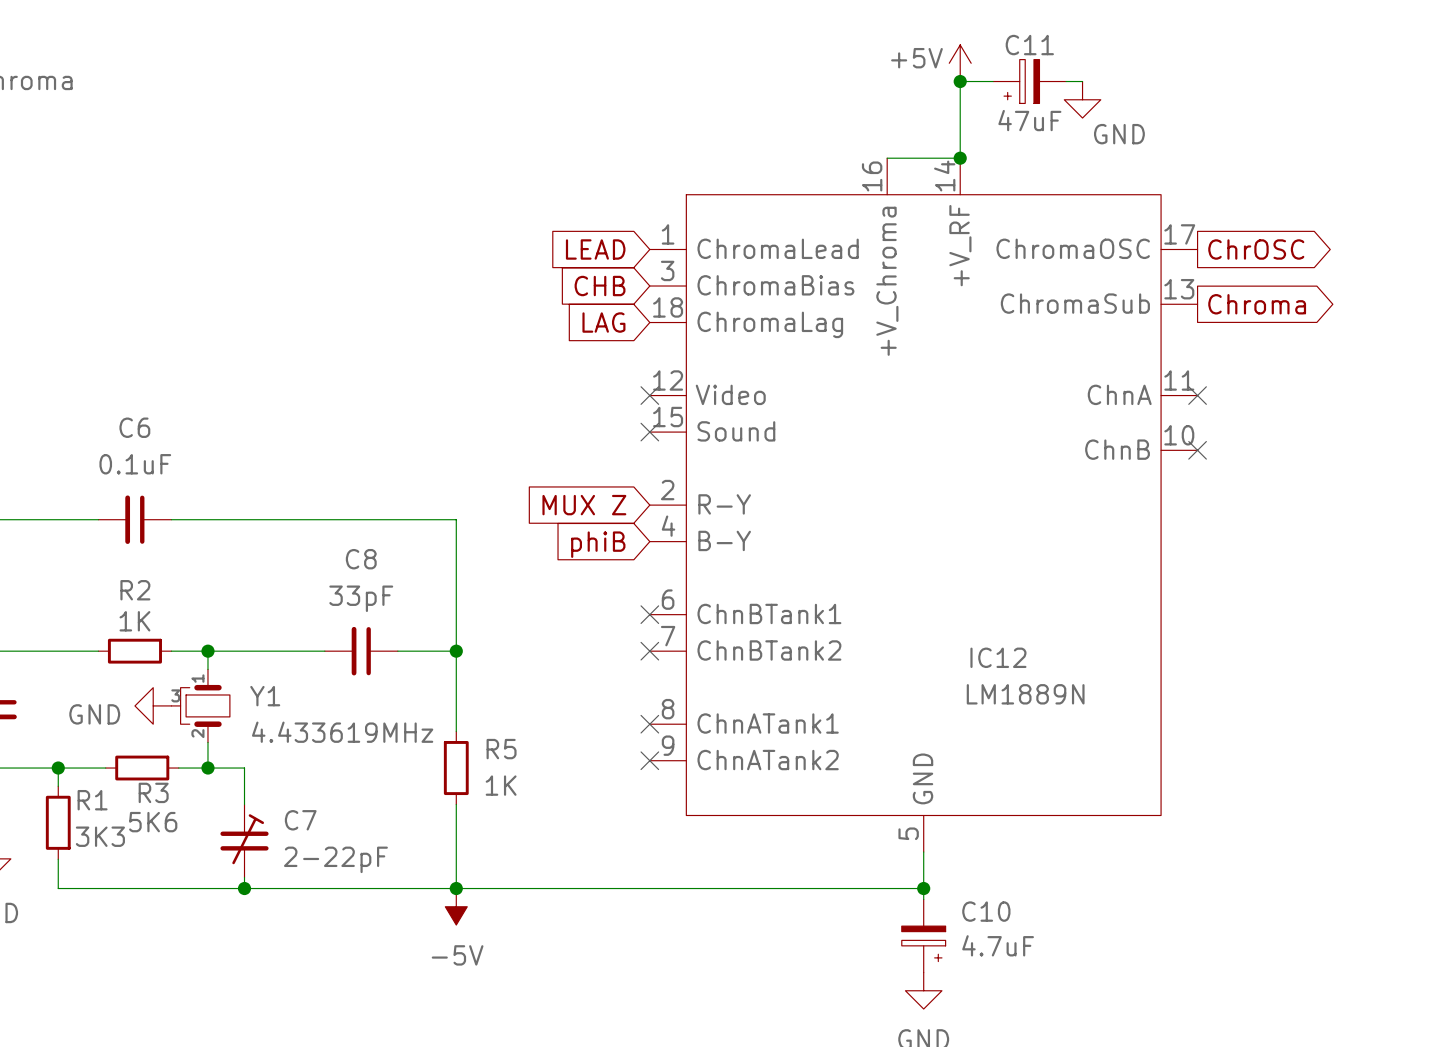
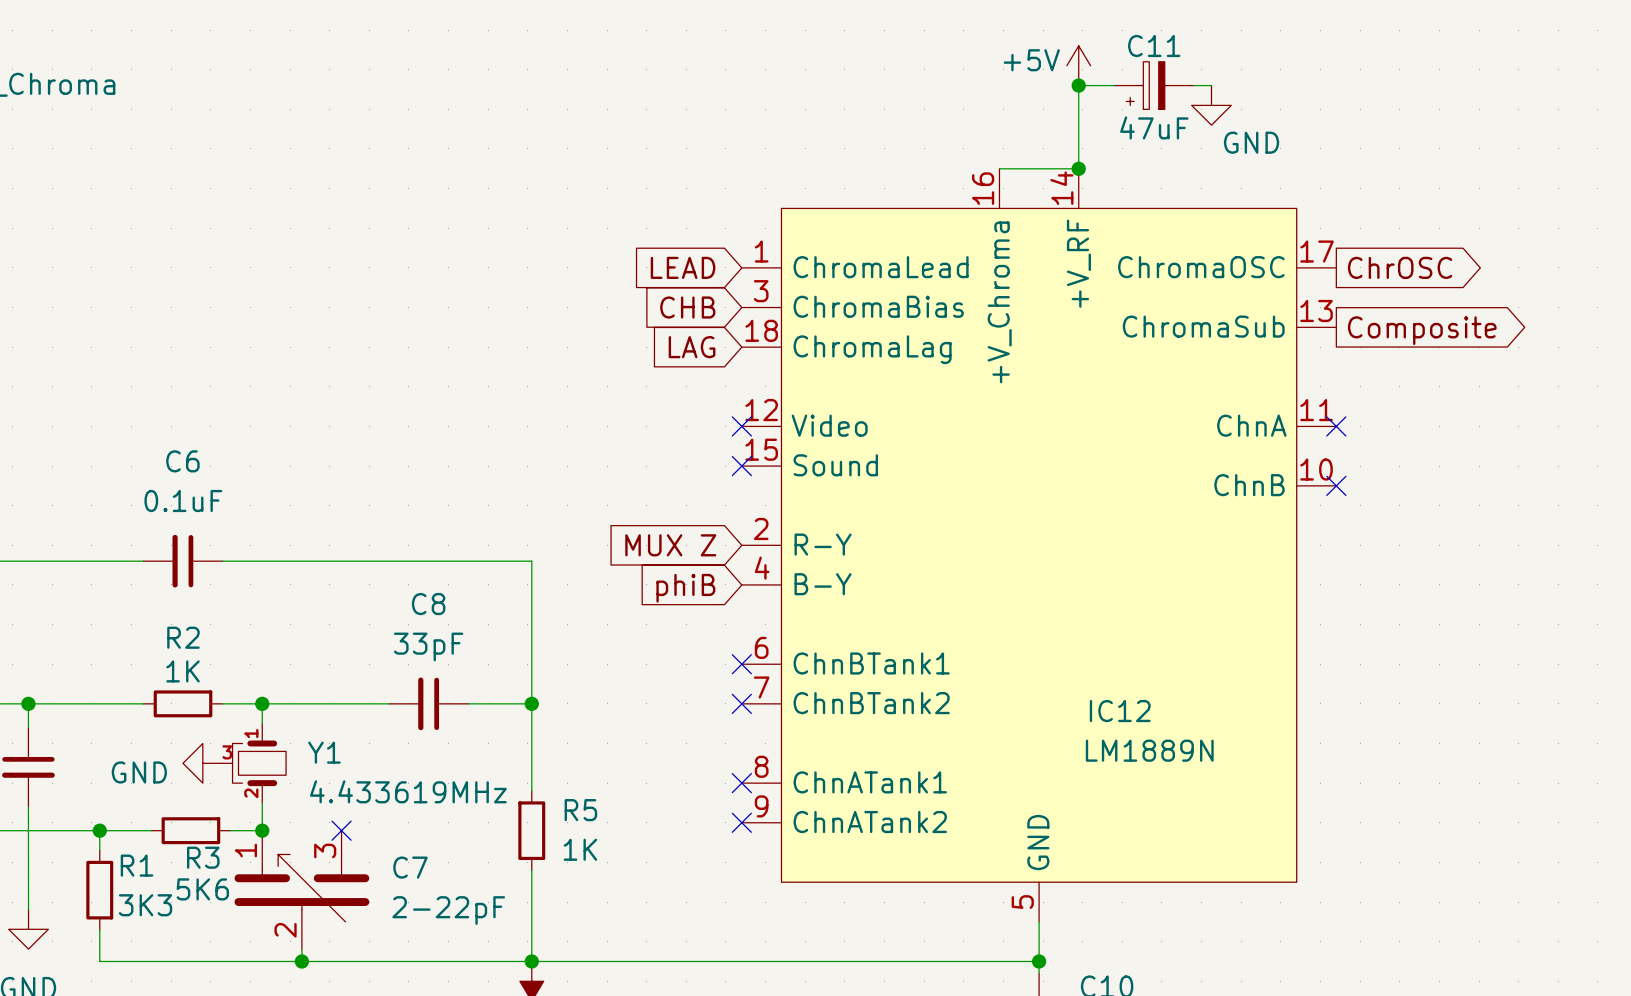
global label: Chroma (1257, 304) -> Composite (1422, 330)
wire: (207, 768) (244, 768) (244, 804) -> none
no-connect mark: none -> (341, 830)
C7 symbol: [220, 804, 269, 878] -> [234, 830, 370, 950]
C7 name position: C7 (300, 820) -> C7 (410, 867)
C7 value position: 2-22pF (335, 859) -> 2-22pF (448, 910)

